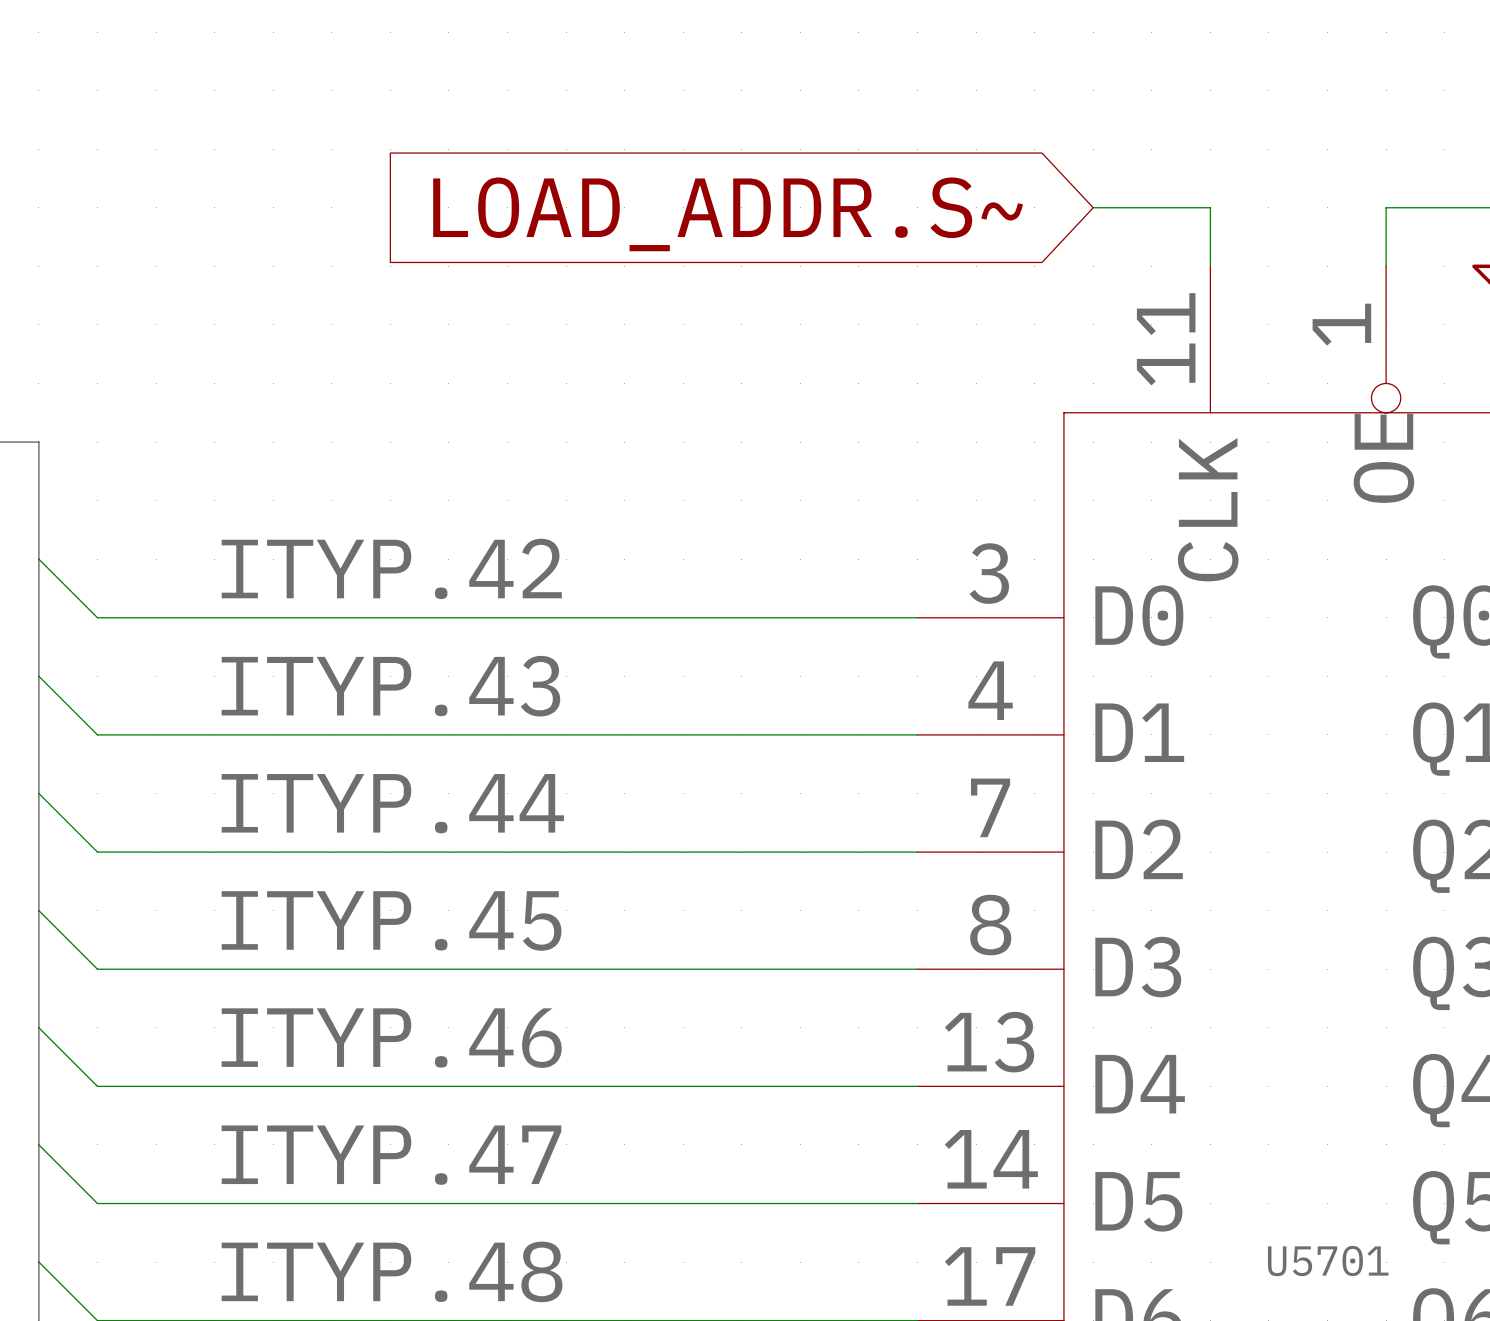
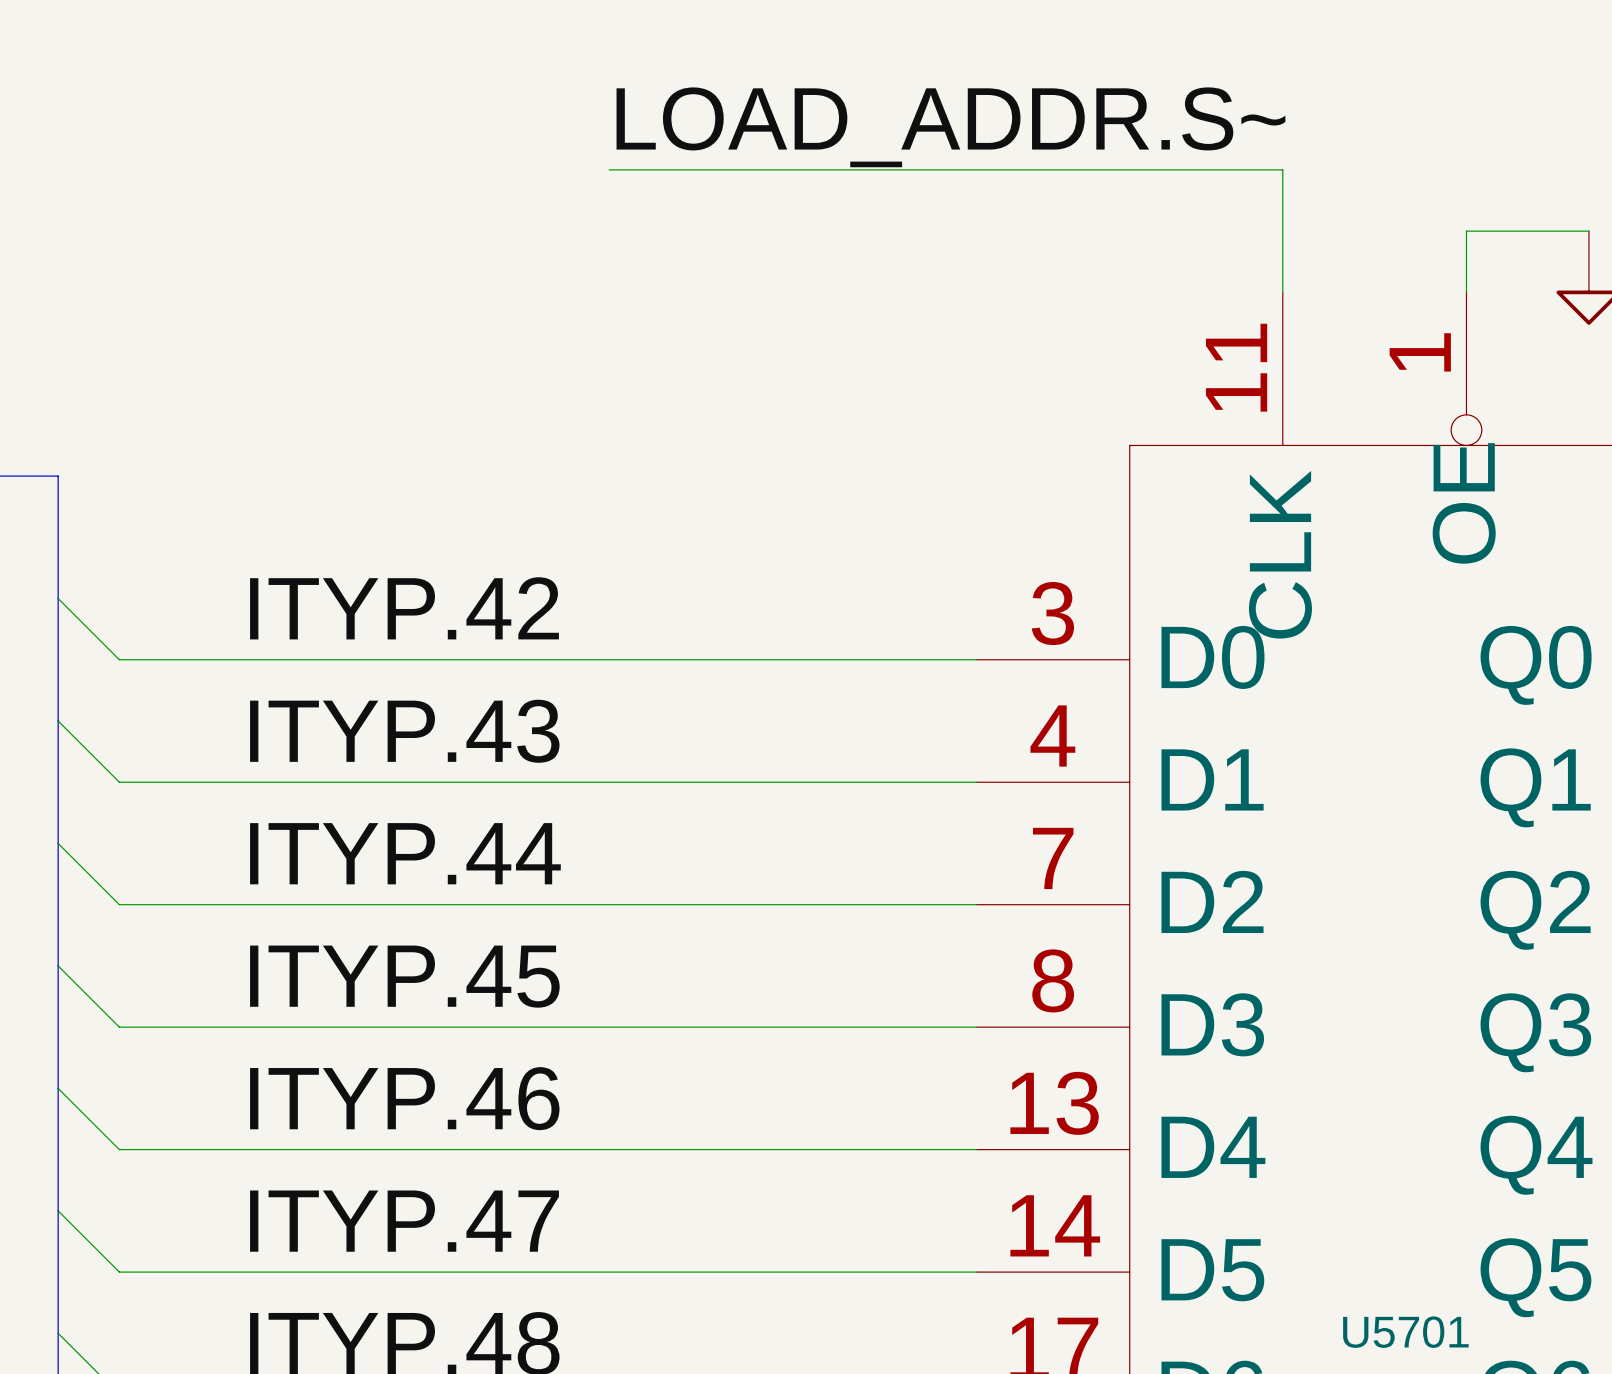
label: none -> LOAD_ADDR.S~ (950, 127)
wire: (1093, 207) (1210, 207) -> (609, 169) (1282, 169) (1282, 231)
global label: LOAD_ADDR.S~ (728, 214) -> none

